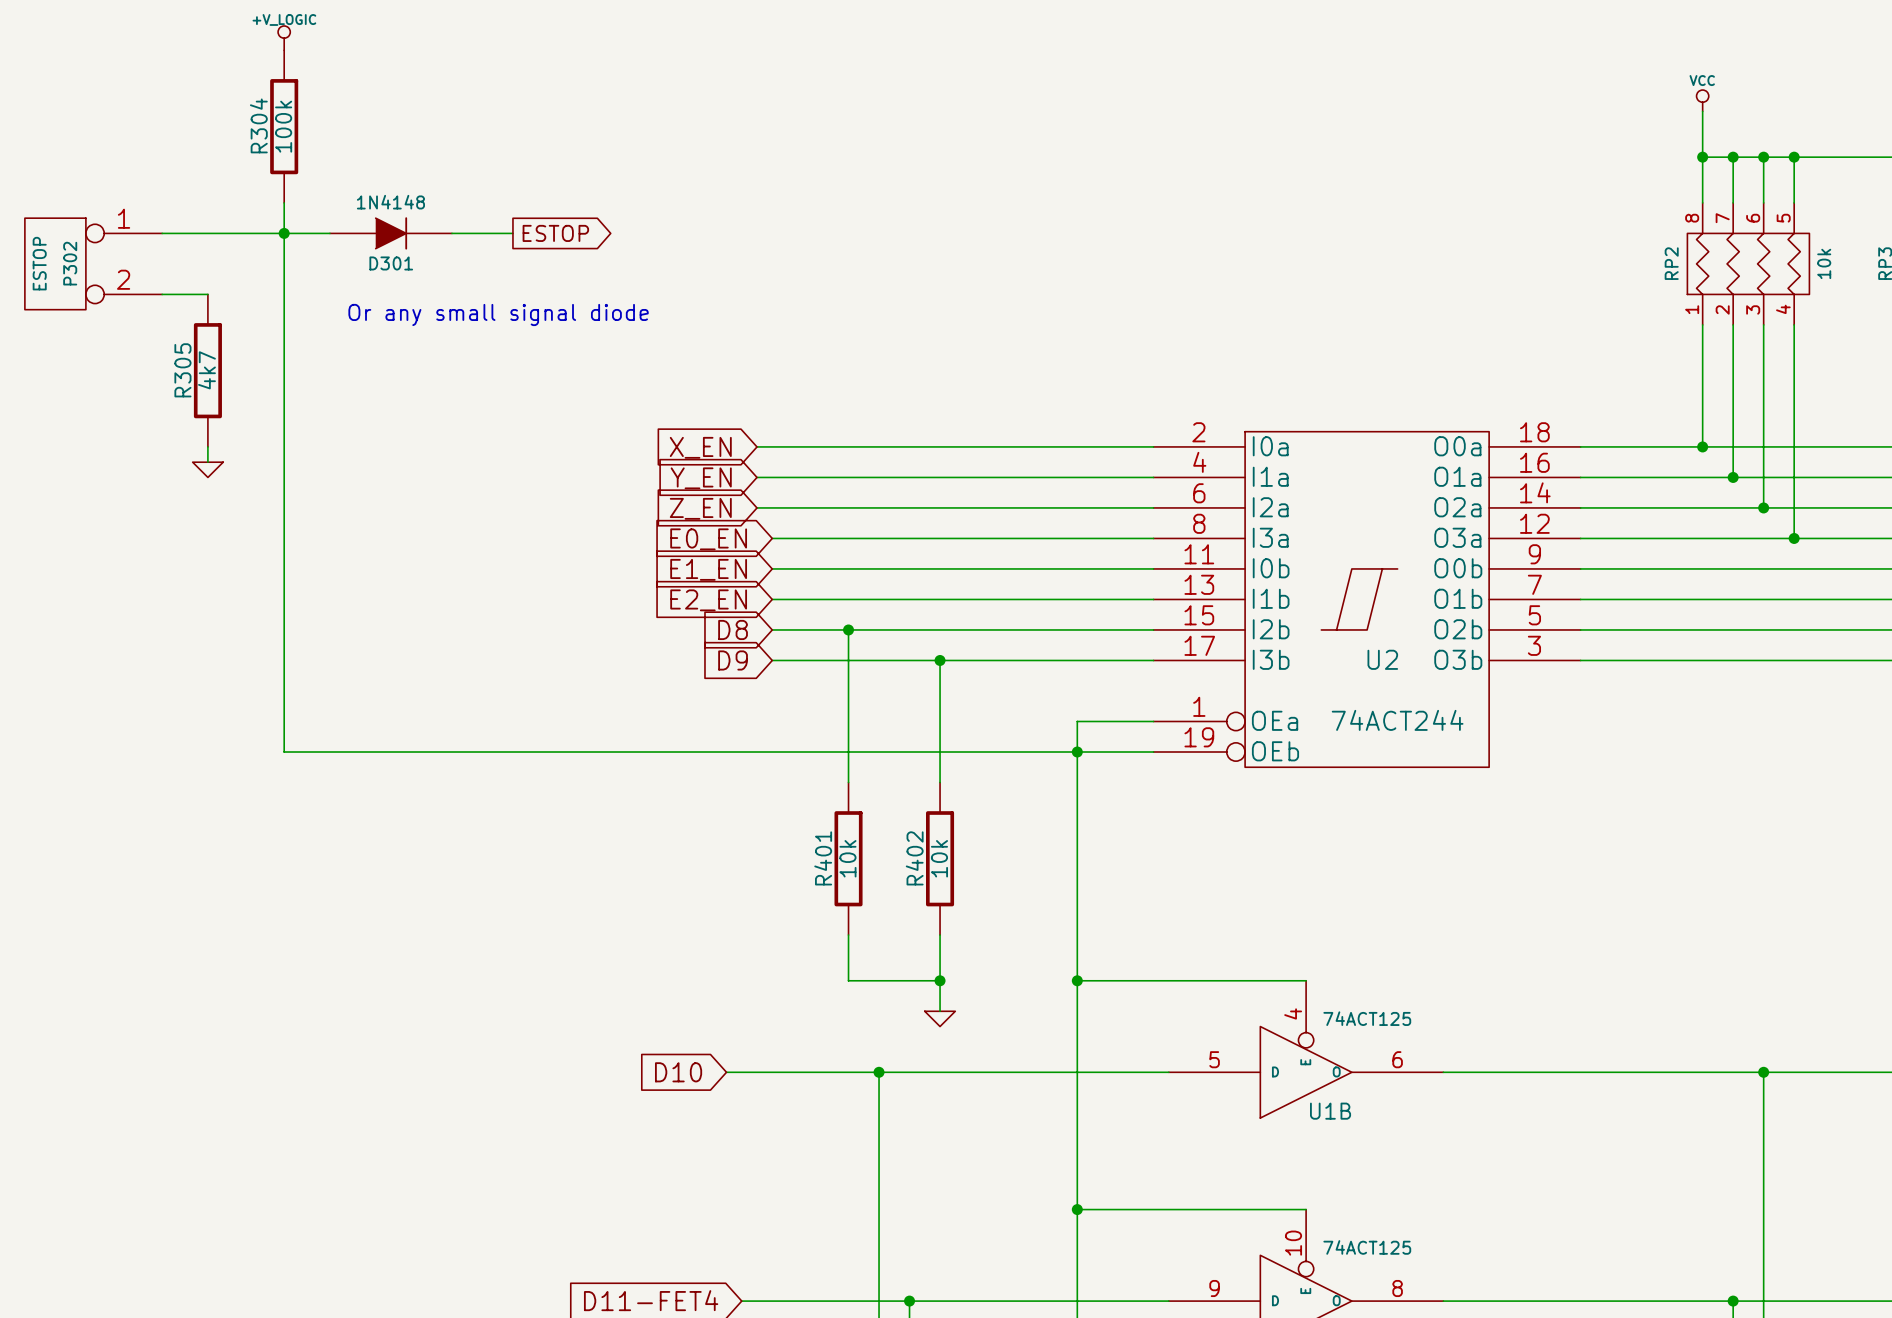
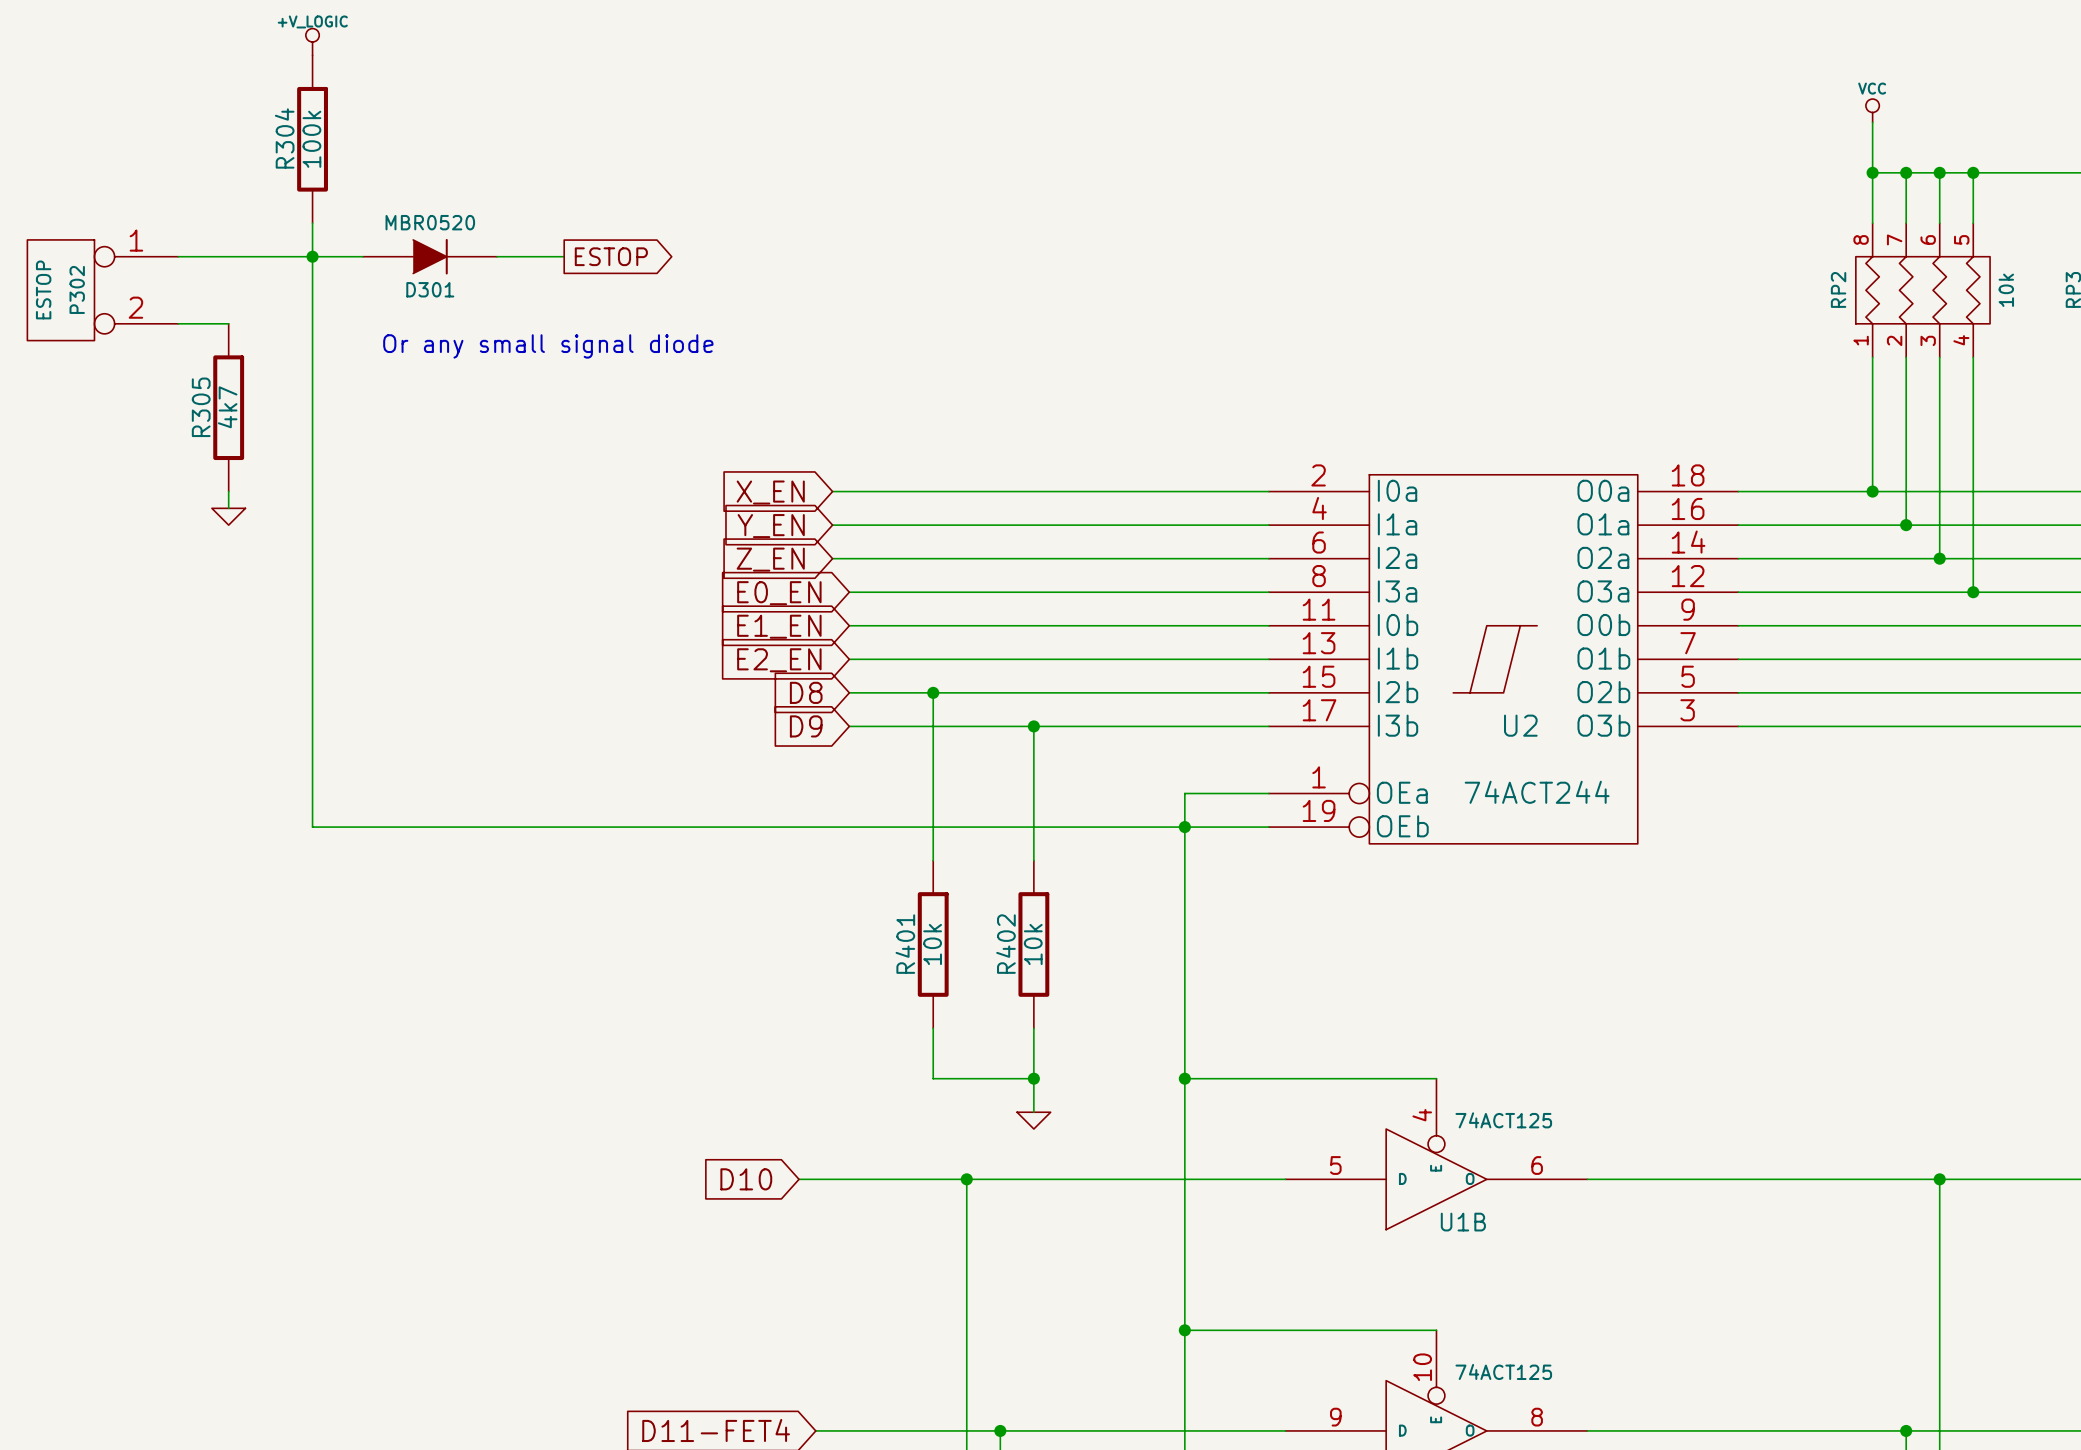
D301 value: 1N4148 (390, 202) -> MBR0520 (430, 222)

